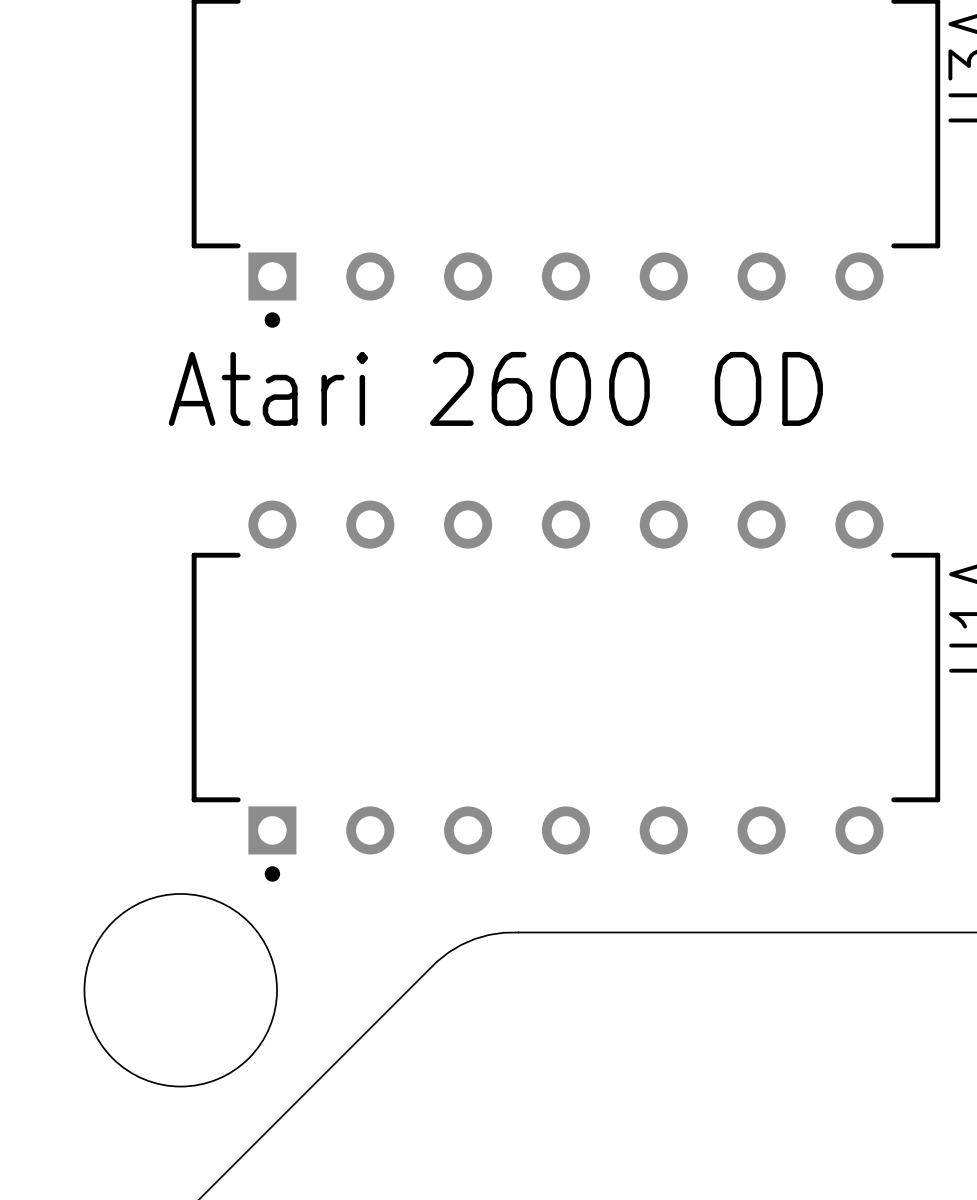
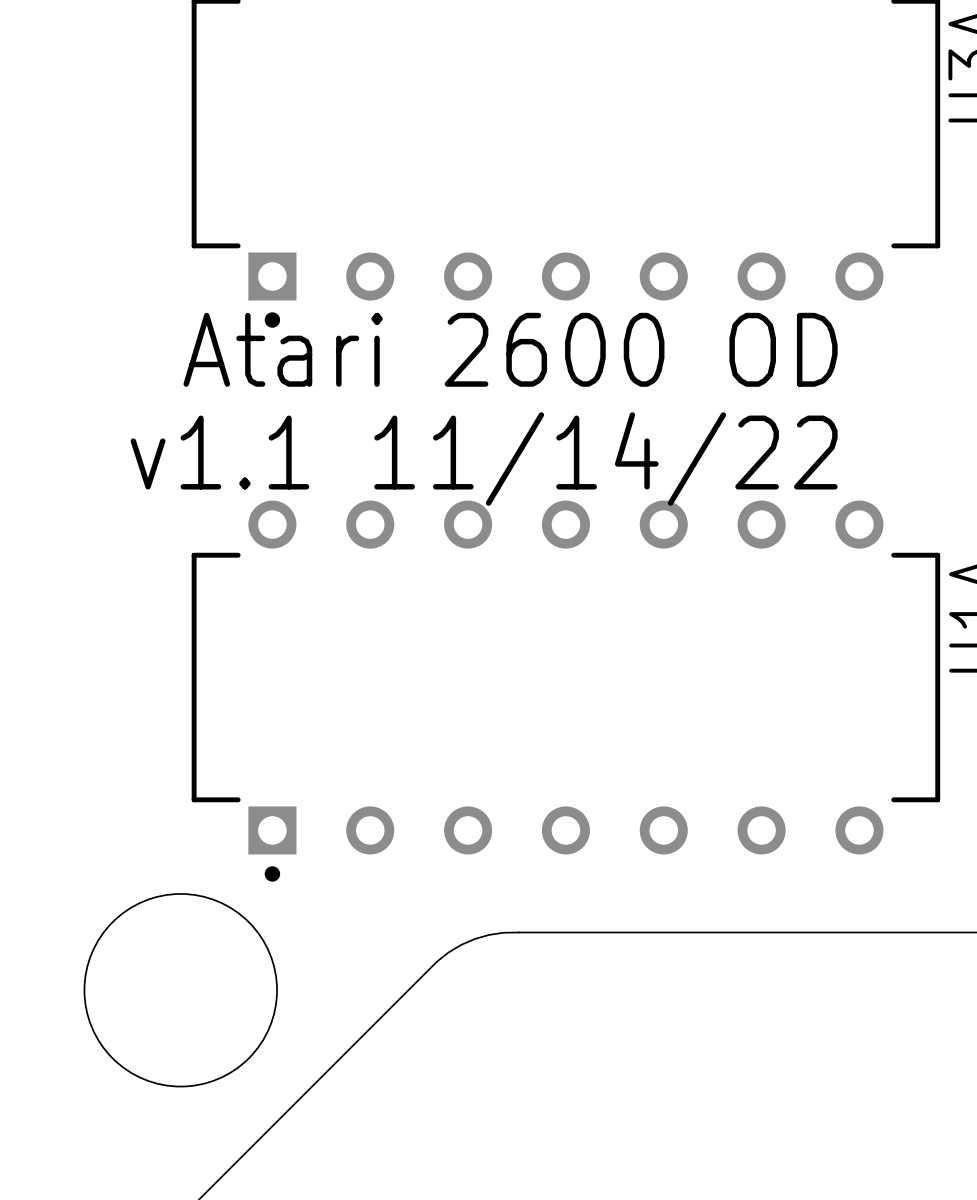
text position: Atari 2600 OD (495, 388) -> Atari 2600 OD (510, 349)
text: none -> v1.1 11/14/22 (484, 459)

